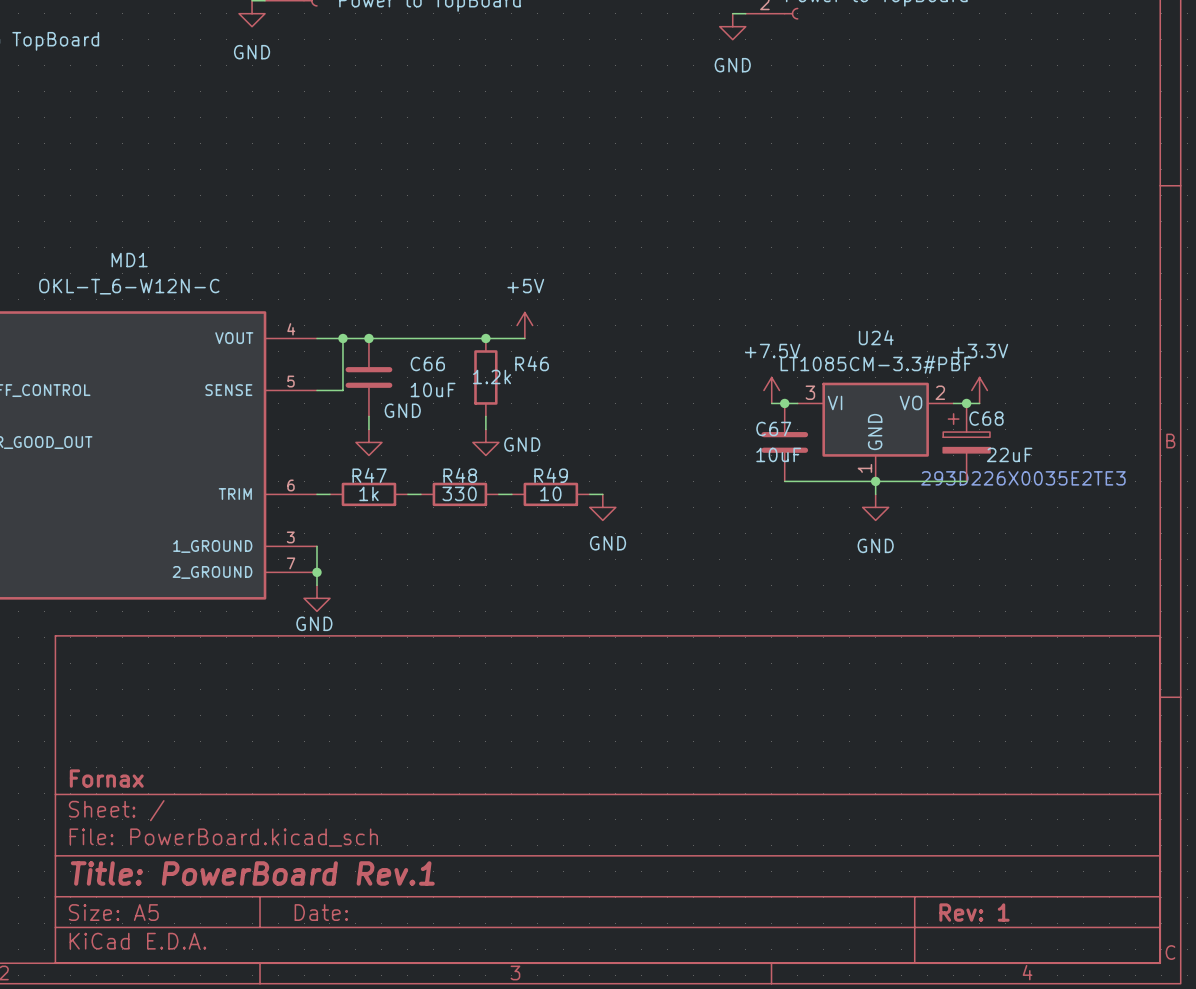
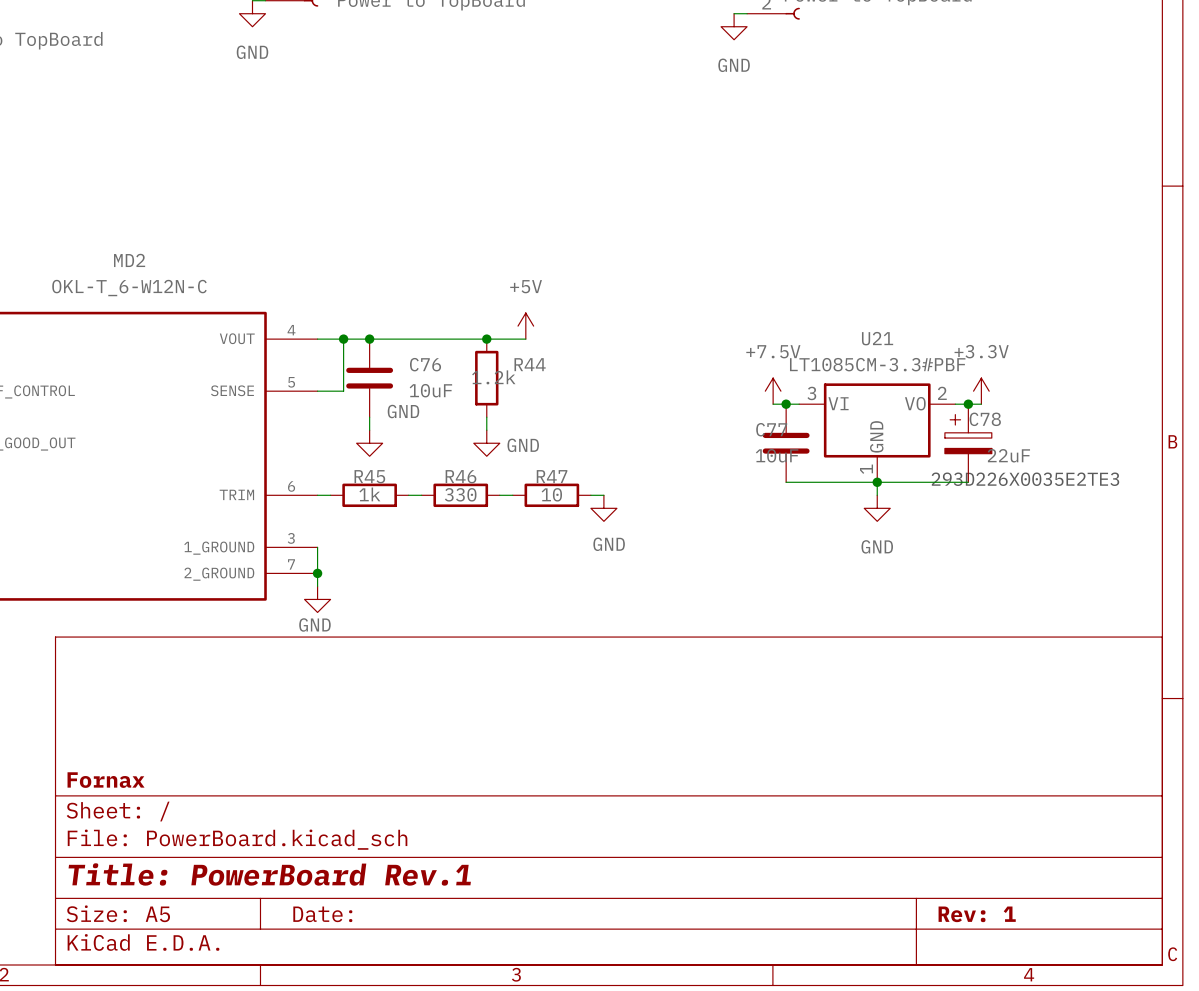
MD1 name: MD1 (129, 260) -> MD2 (129, 260)
U24 name: U24 (876, 337) -> U21 (877, 338)
R46 name: R46 (532, 363) -> R44 (530, 364)
C66 name: C66 (427, 364) -> C76 (425, 364)
C68 name: C68 (986, 418) -> C78 (985, 419)
C67 name: C67 (773, 428) -> C77 (771, 429)
R47 name: R47 (369, 475) -> R45 (369, 476)
R48 name: R48 (460, 475) -> R46 (460, 476)
R49 name: R49 (551, 475) -> R47 (552, 476)

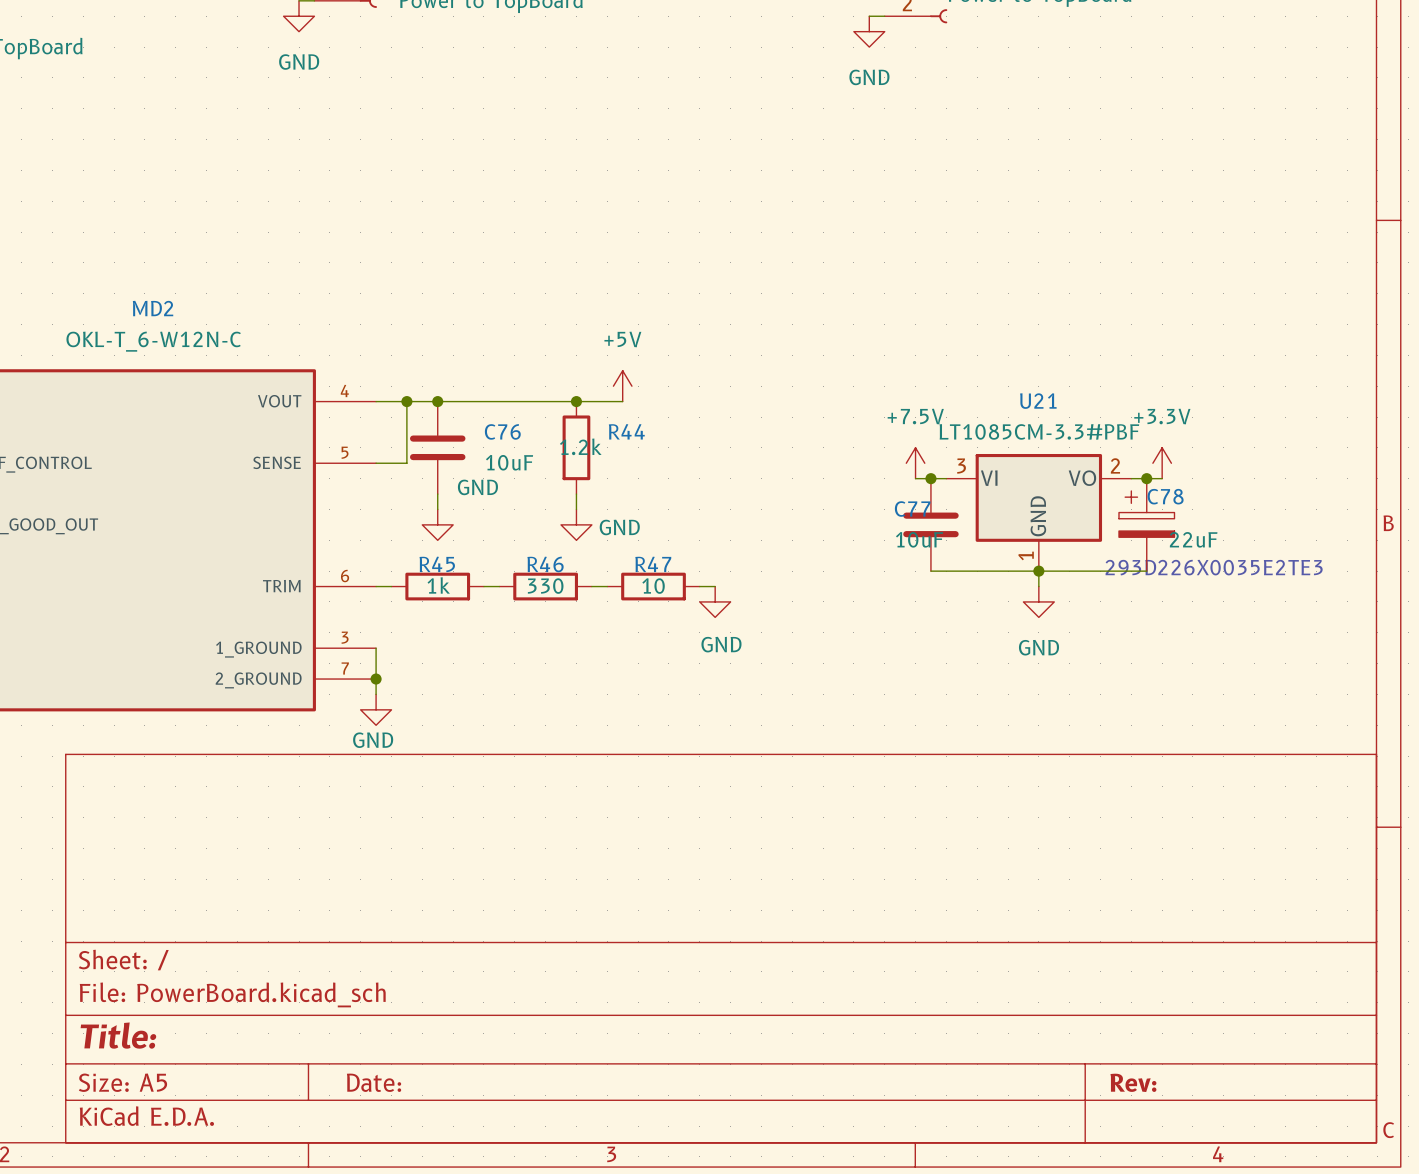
title block: Fornax (106, 780) -> none
title block: Title: PowerBoard Rev.1 (269, 874) -> Title: (118, 1035)
title block: Rev: 1 (977, 914) -> Rev: (1133, 1082)

